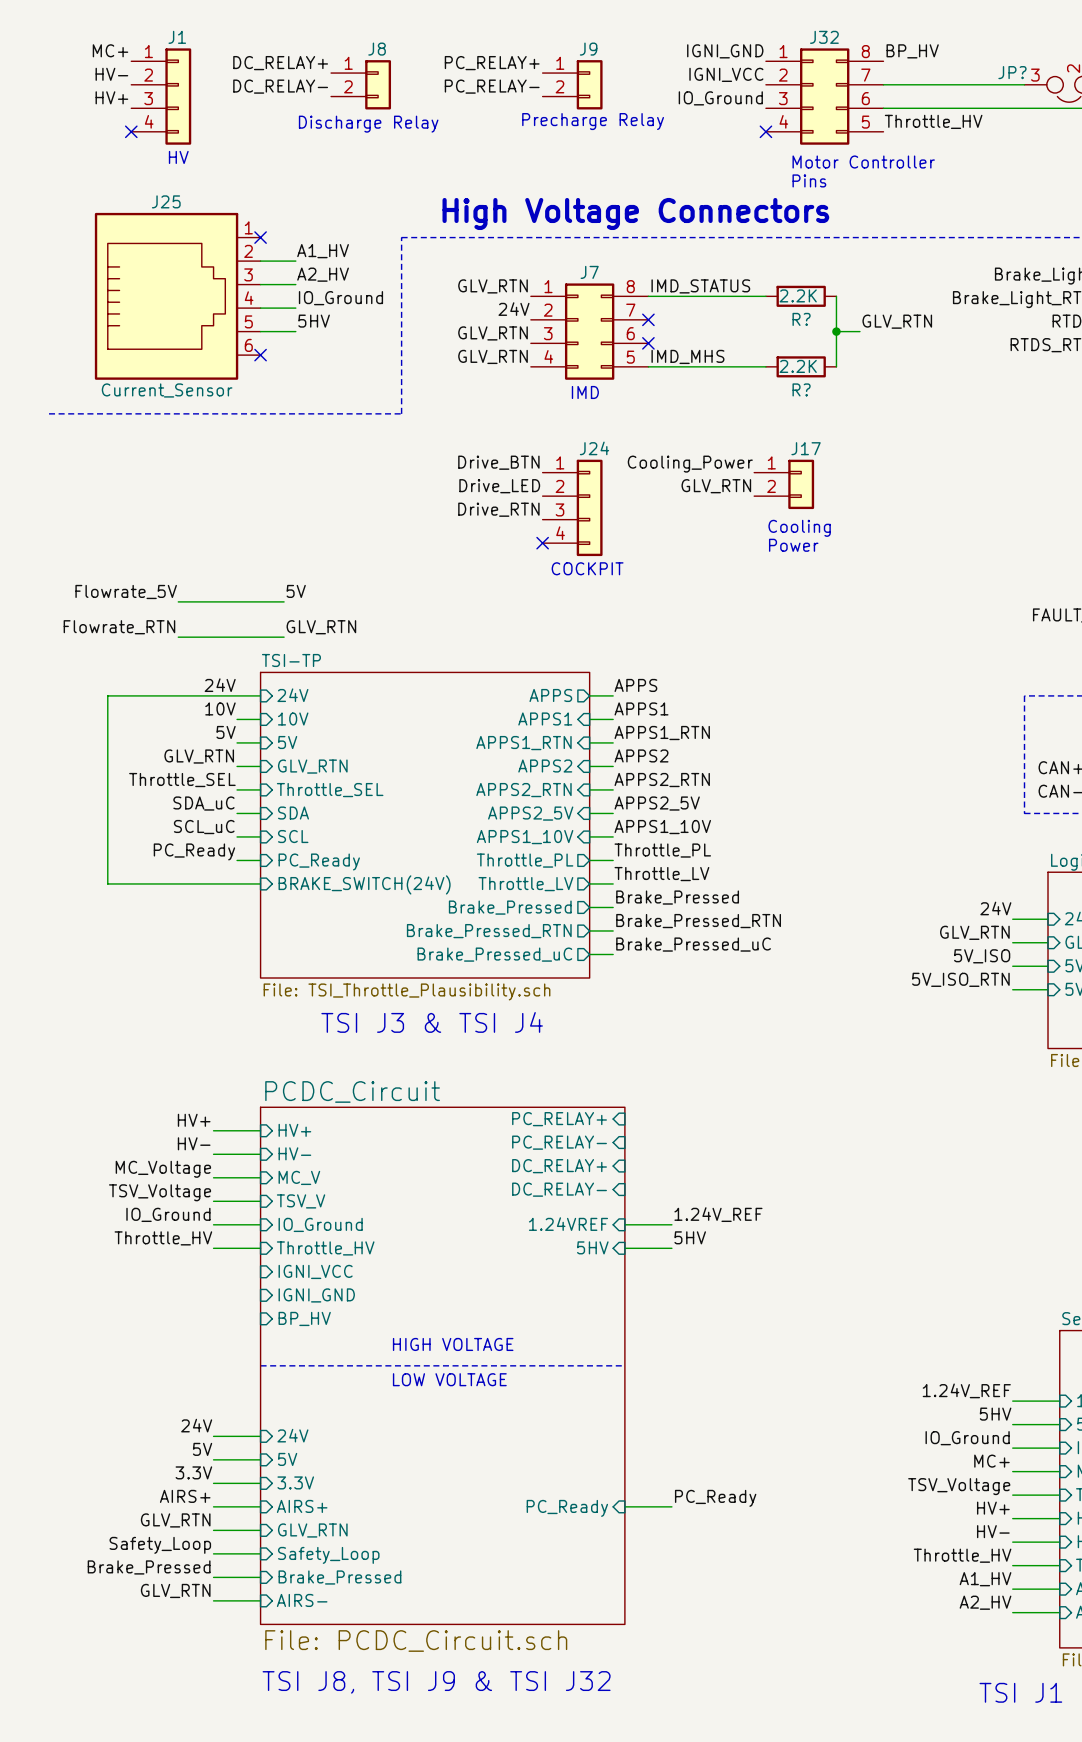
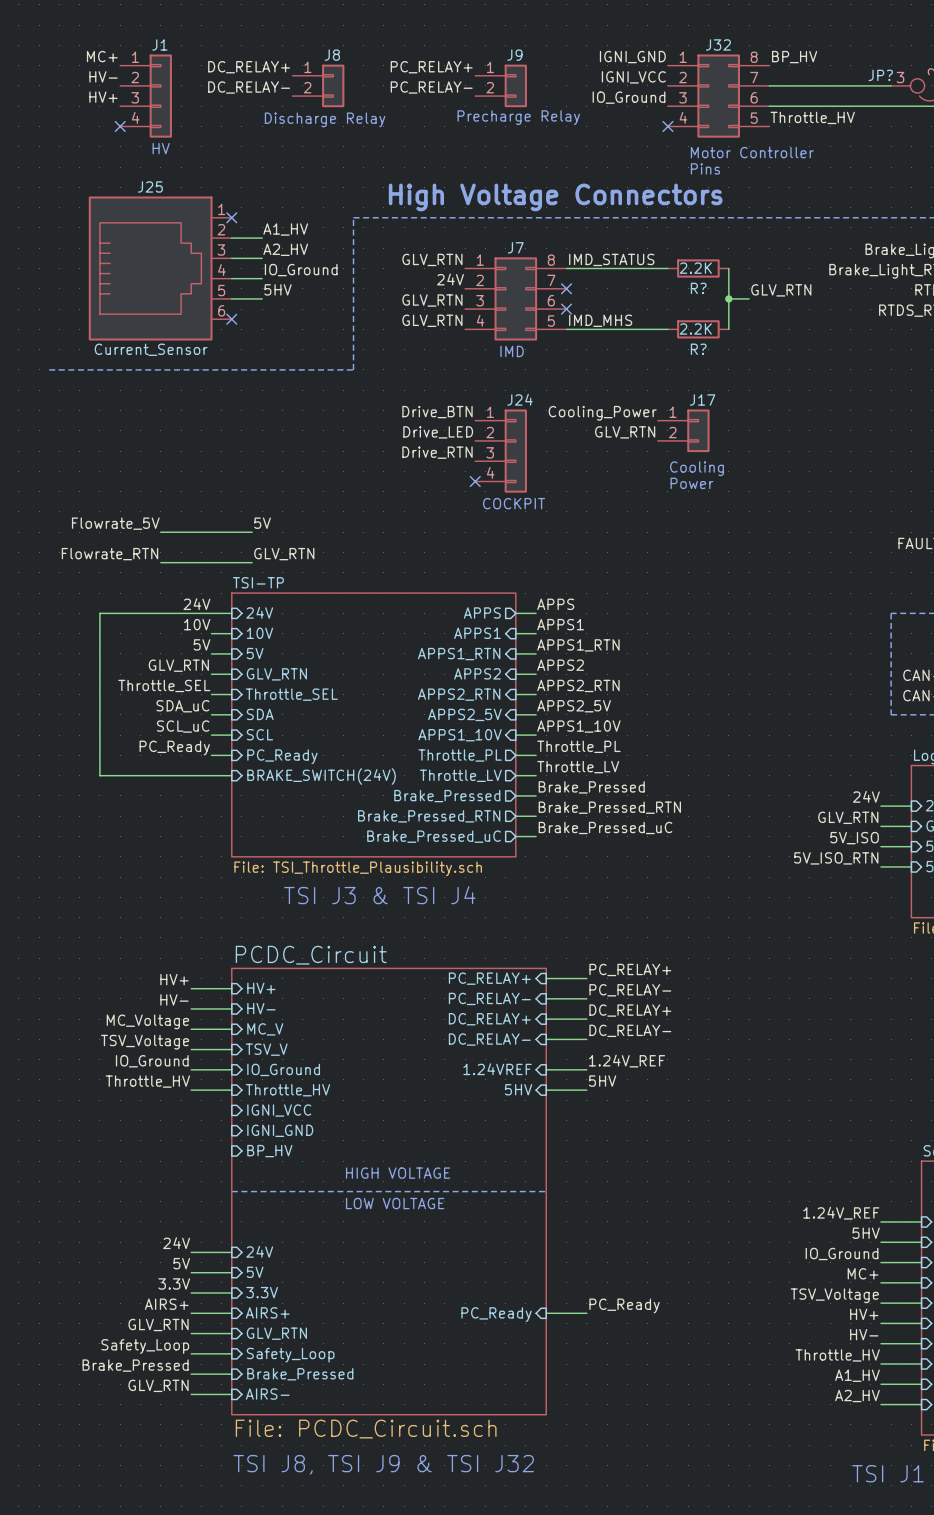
label: none -> PC_RELAY+ (630, 969)
wire: none -> (546, 978) (586, 978)
label: none -> PC_RELAY- (630, 990)
wire: none -> (546, 998) (586, 998)
label: none -> DC_RELAY+ (630, 1010)
wire: none -> (546, 1019) (586, 1019)
label: none -> DC_RELAY- (630, 1030)
wire: none -> (546, 1039) (586, 1039)

